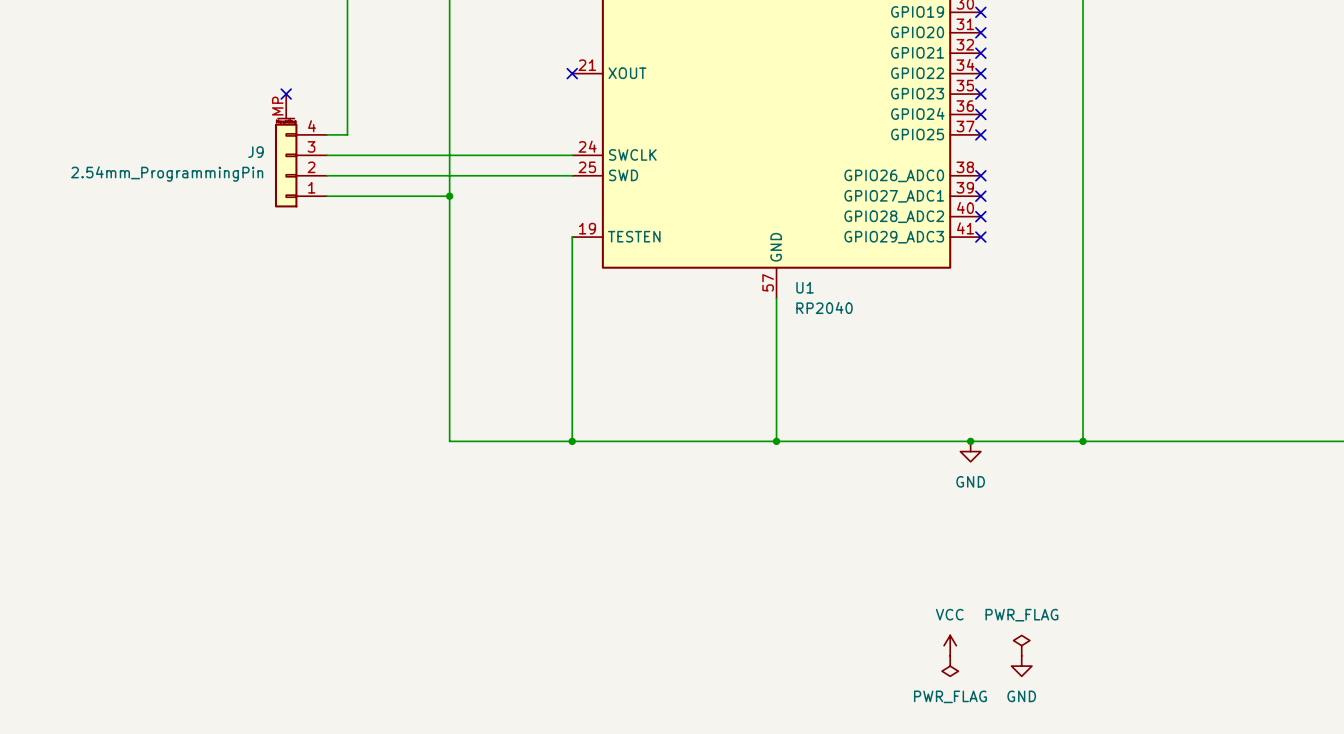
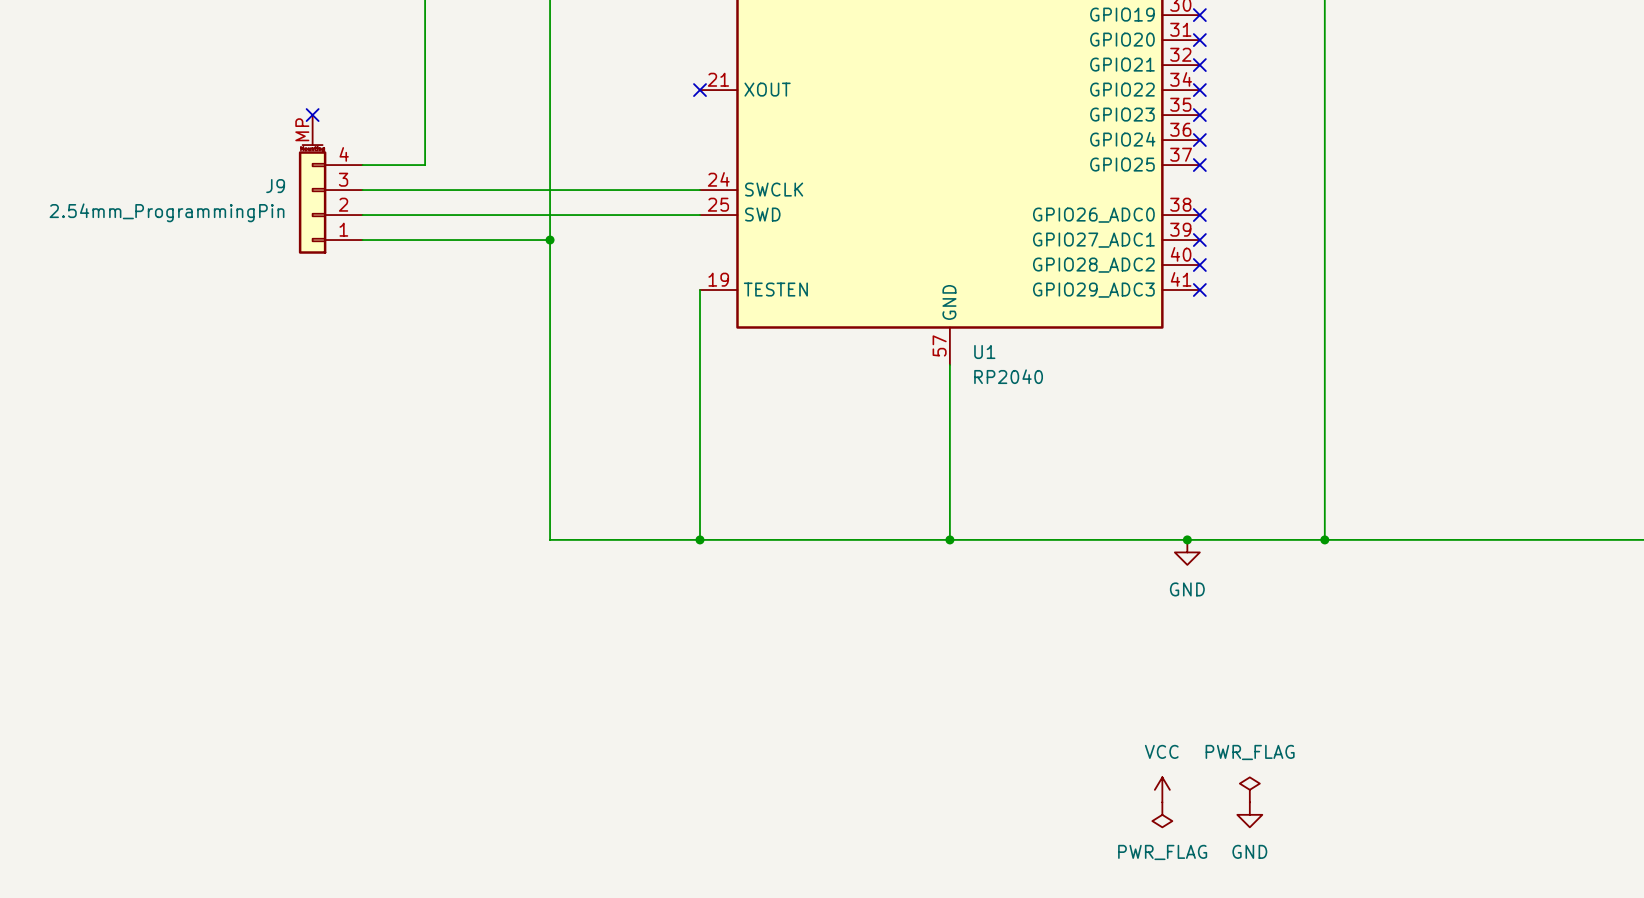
no-connect mark position: (286, 94) -> (312, 115)
J9 position: (301, 150) -> (330, 184)

